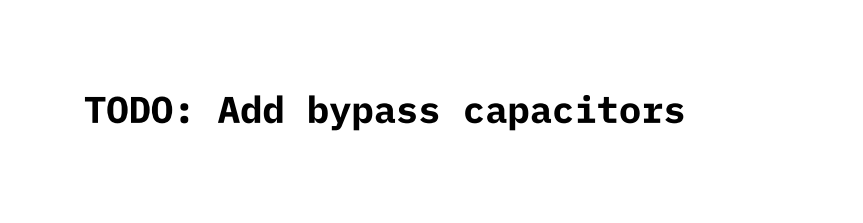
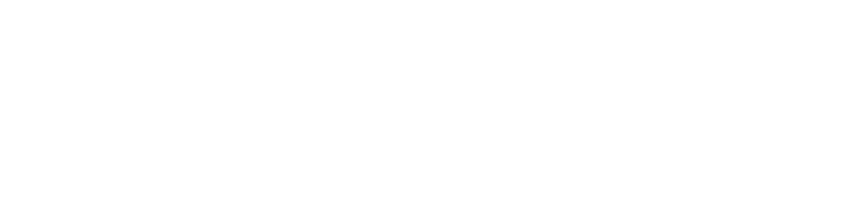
text: TODO: Add bypass capacitors (384, 112) -> none

